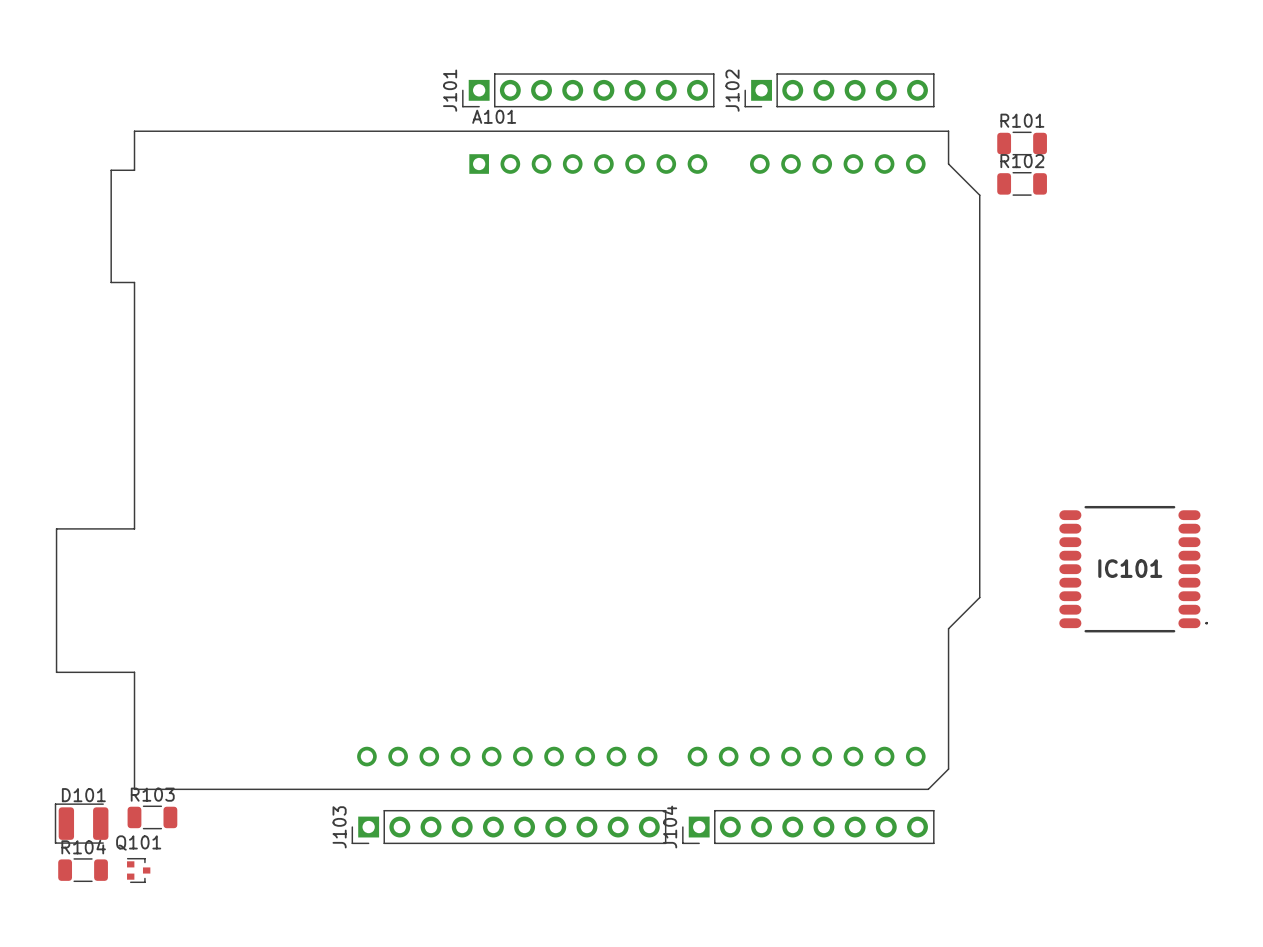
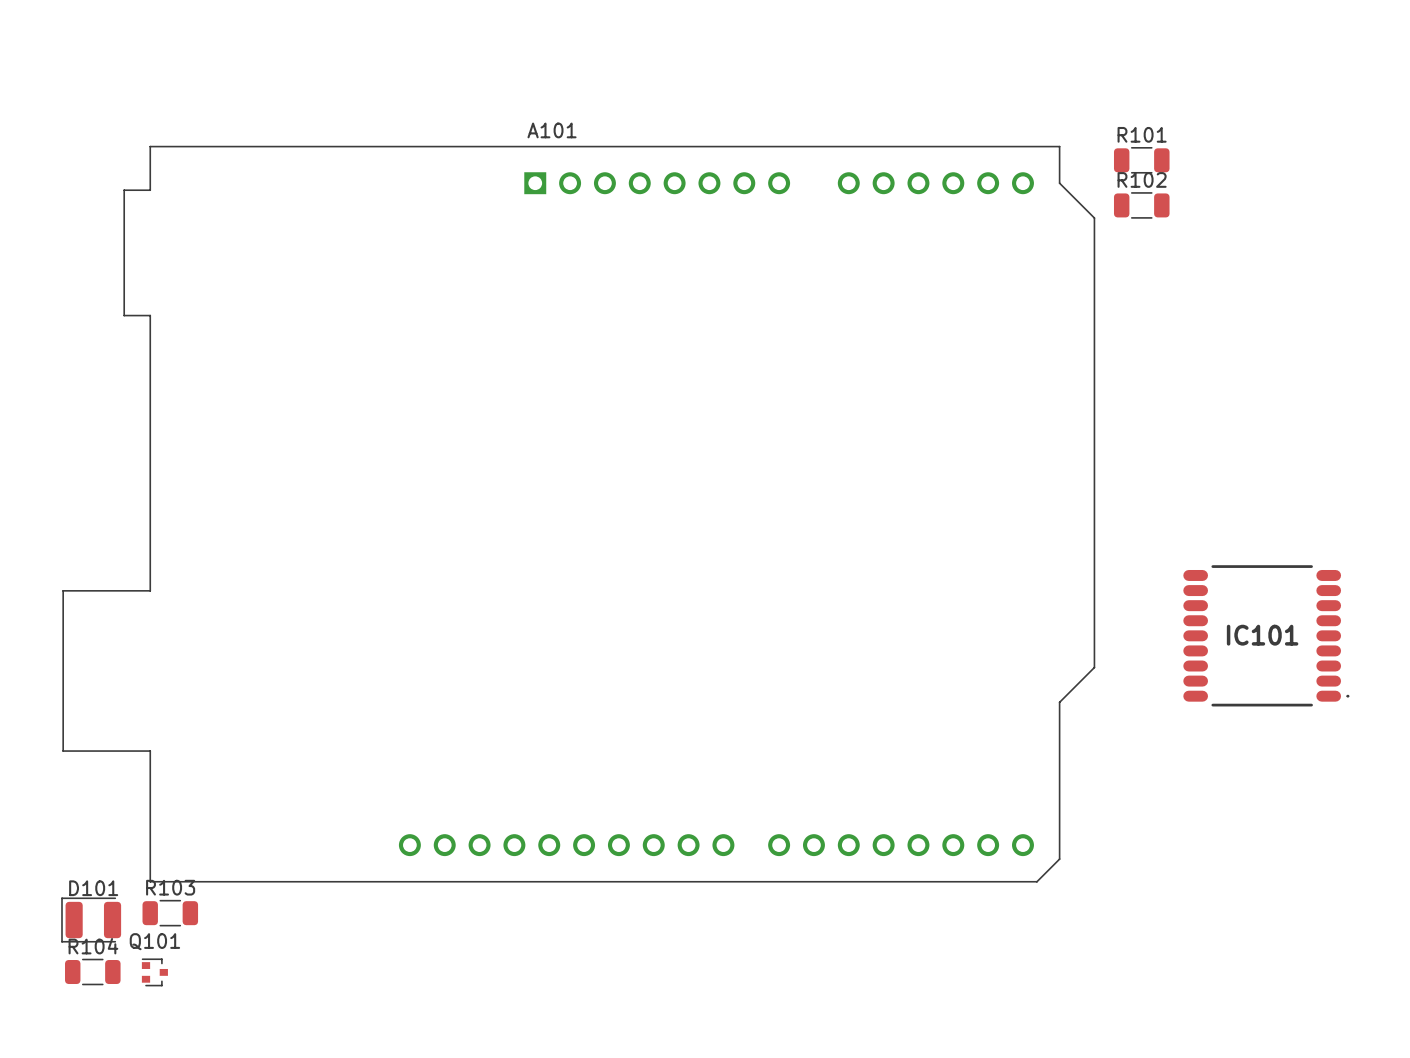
J101: (588, 90) -> none
J102: (839, 90) -> none
J103: (508, 827) -> none
J104: (808, 827) -> none

